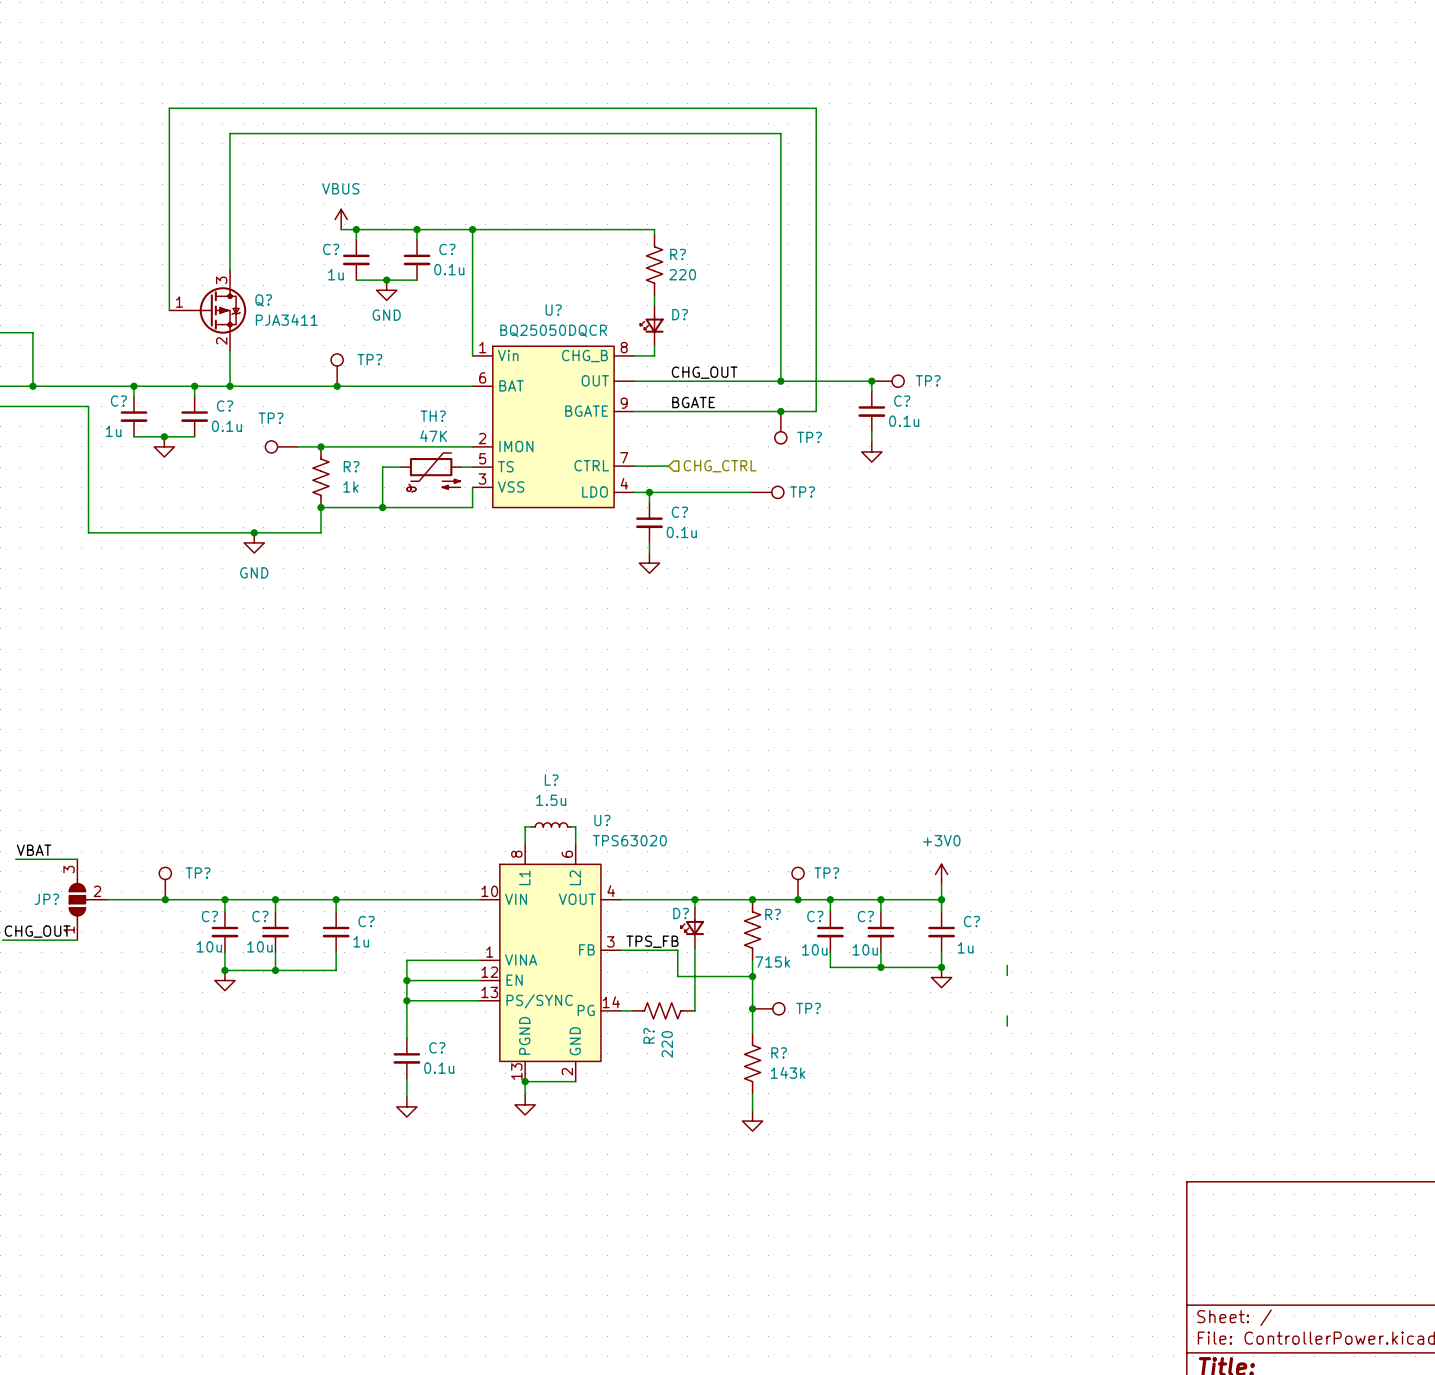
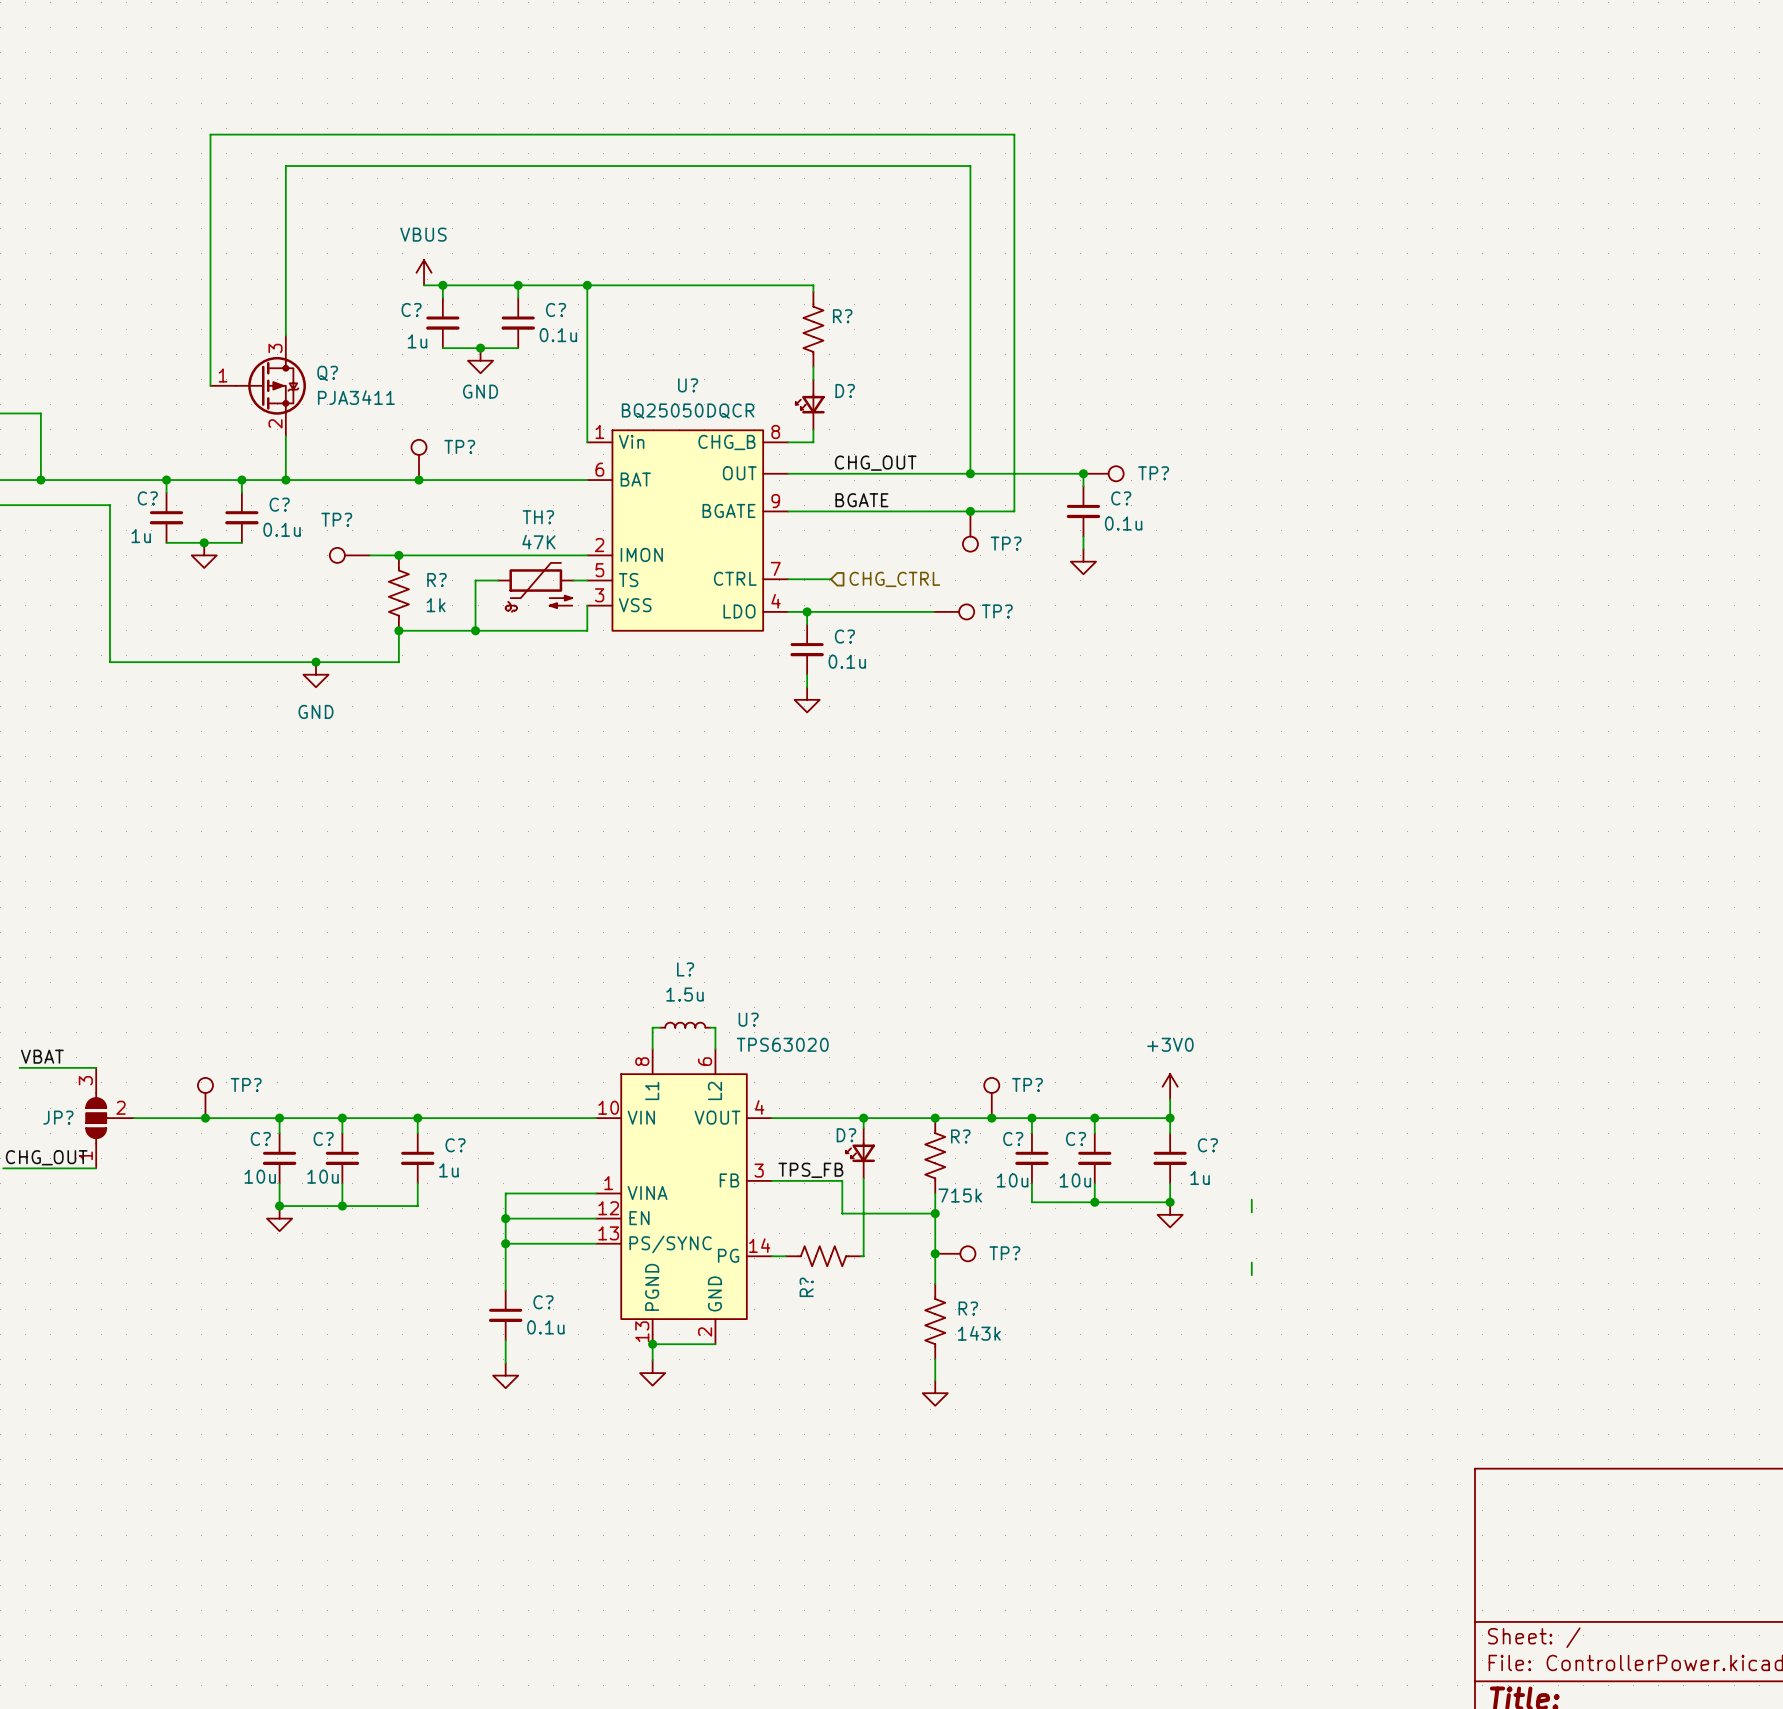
R? value: 220 (682, 274) -> none
R? value: 220 (667, 1044) -> none

